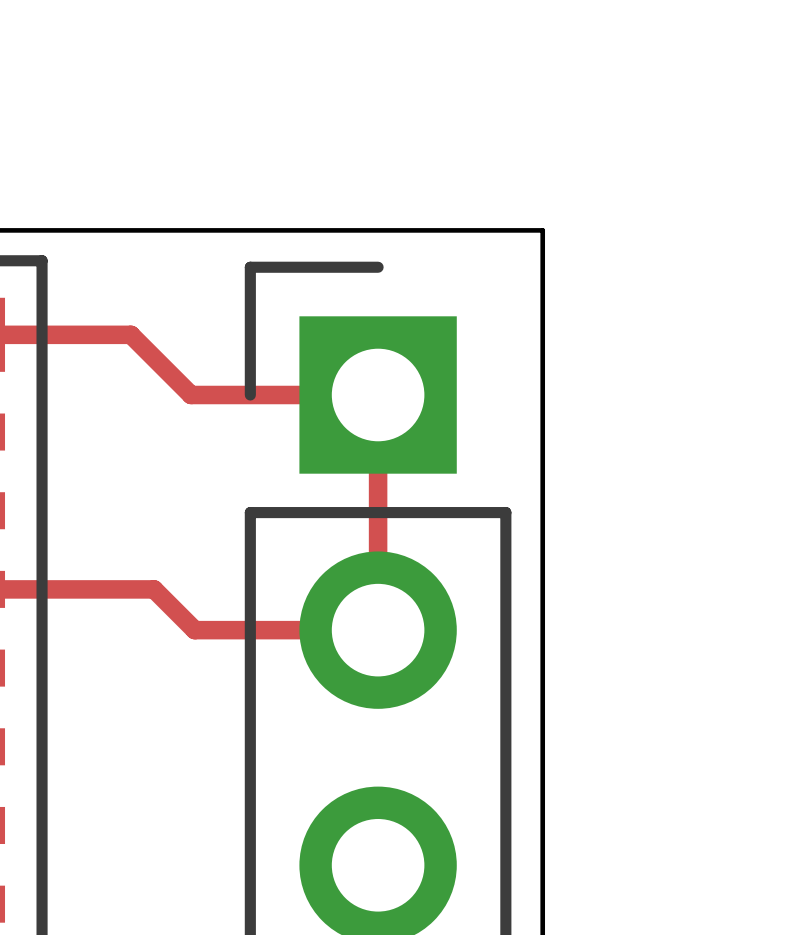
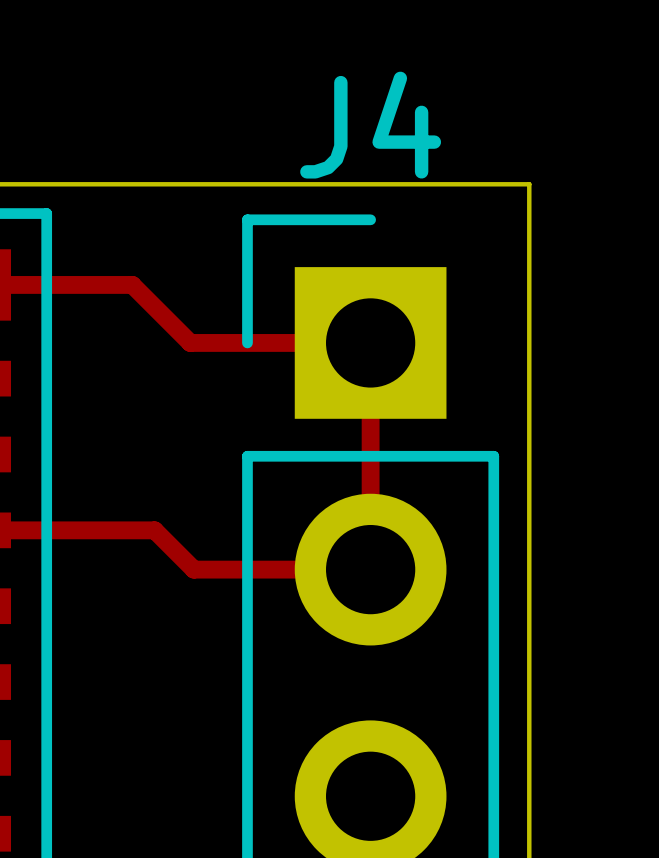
J4 name: none -> J4 (370, 125)

